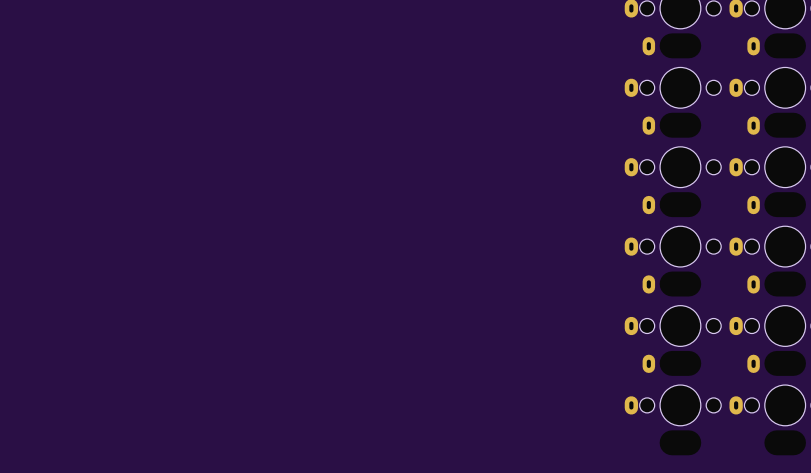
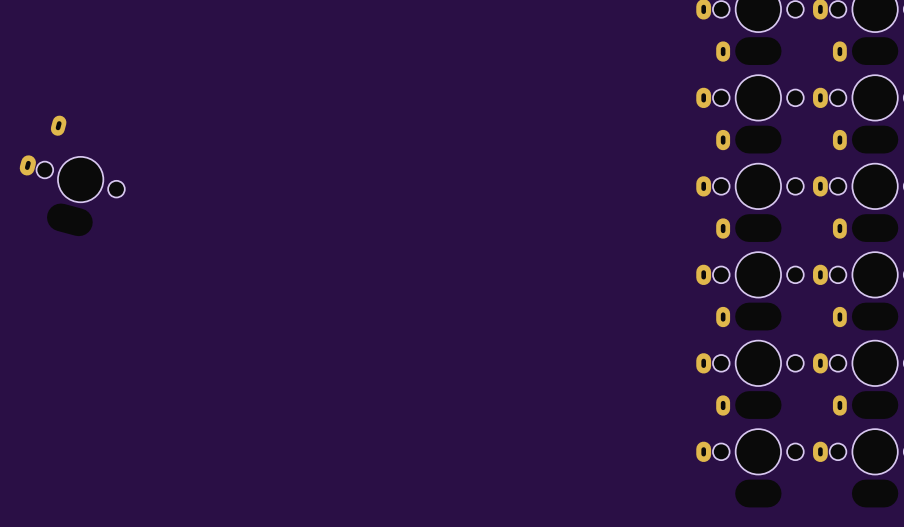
part: none -> (72, 175)

